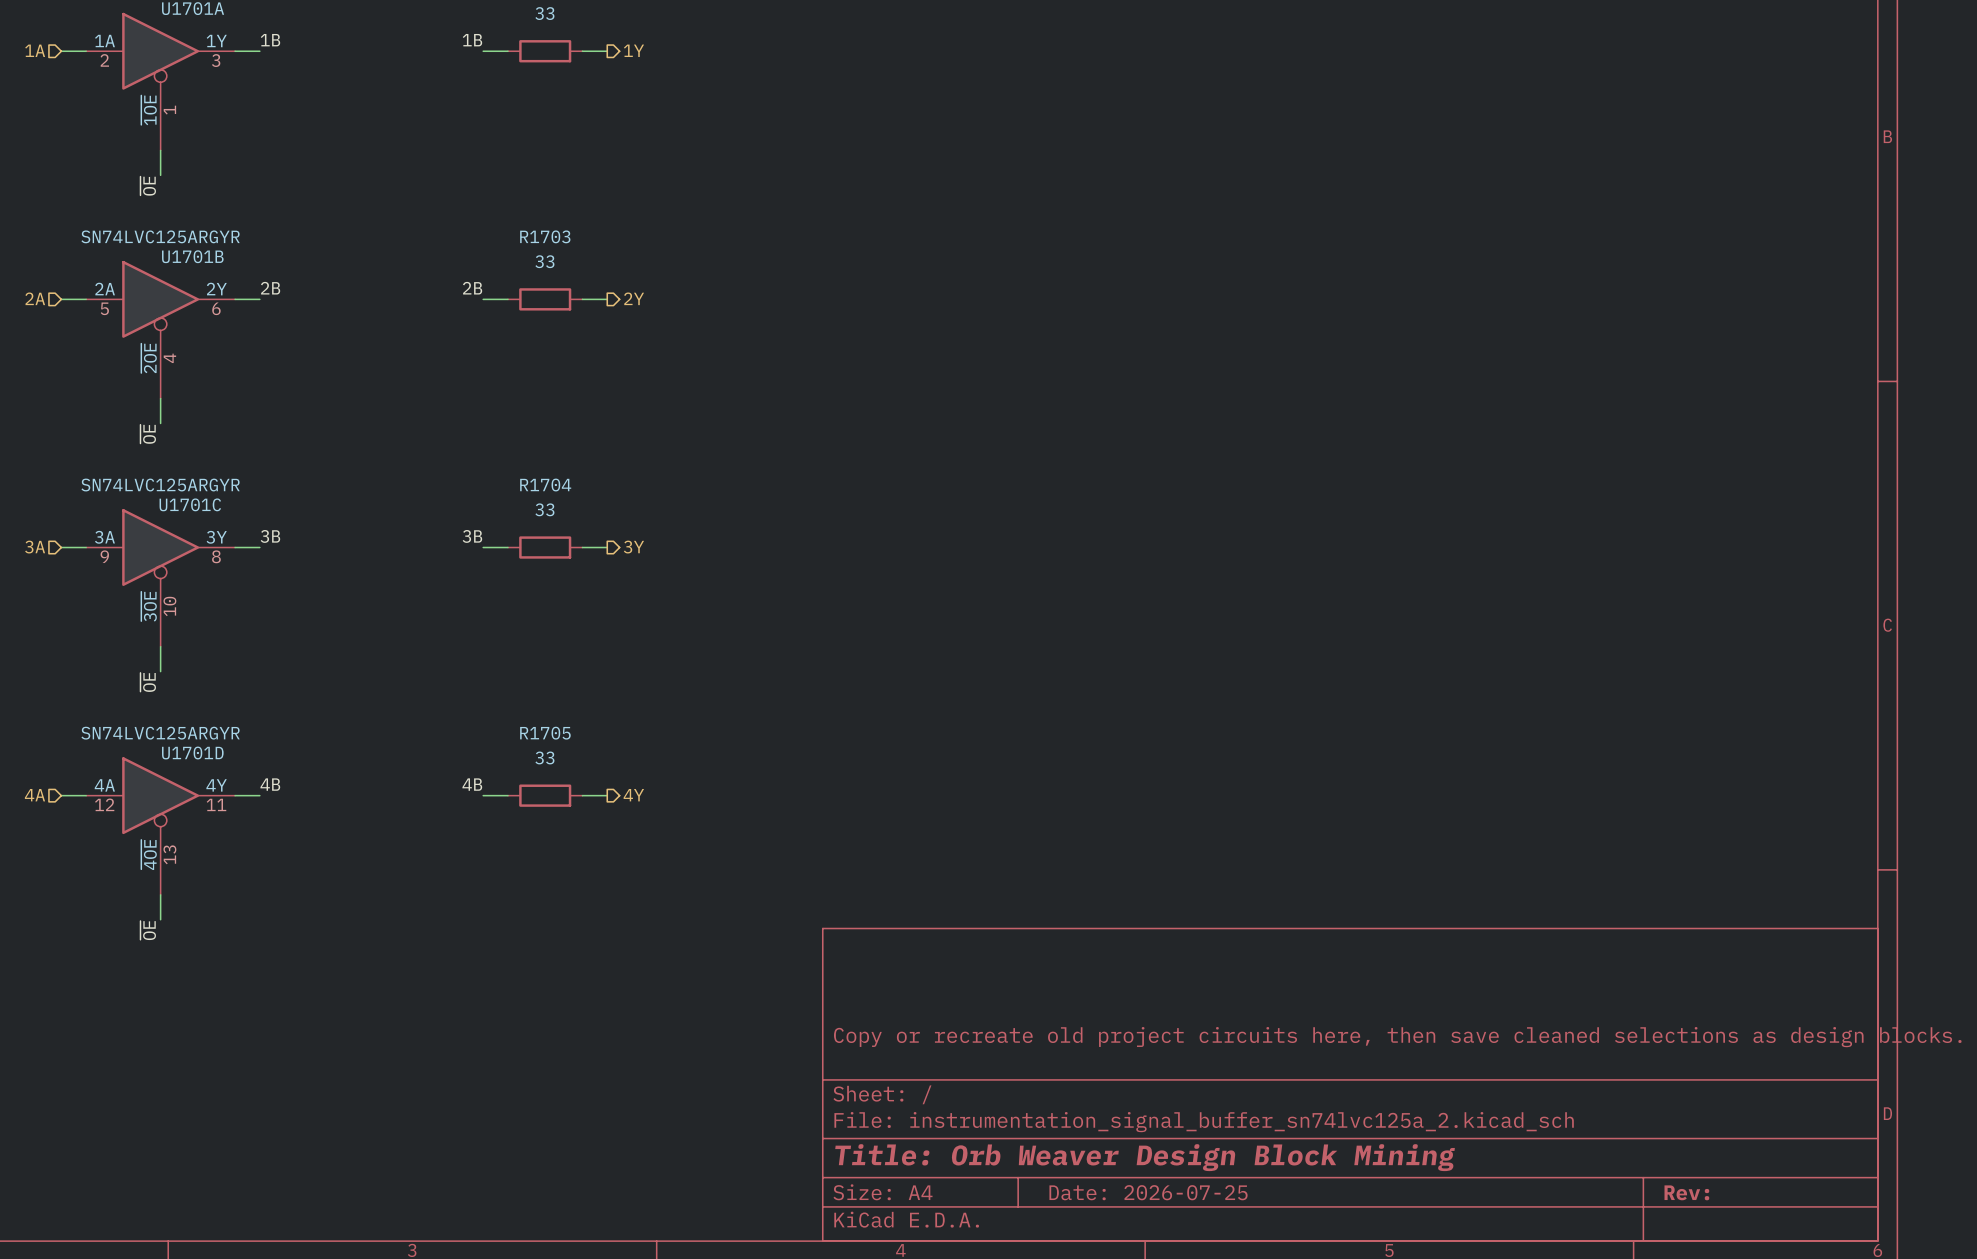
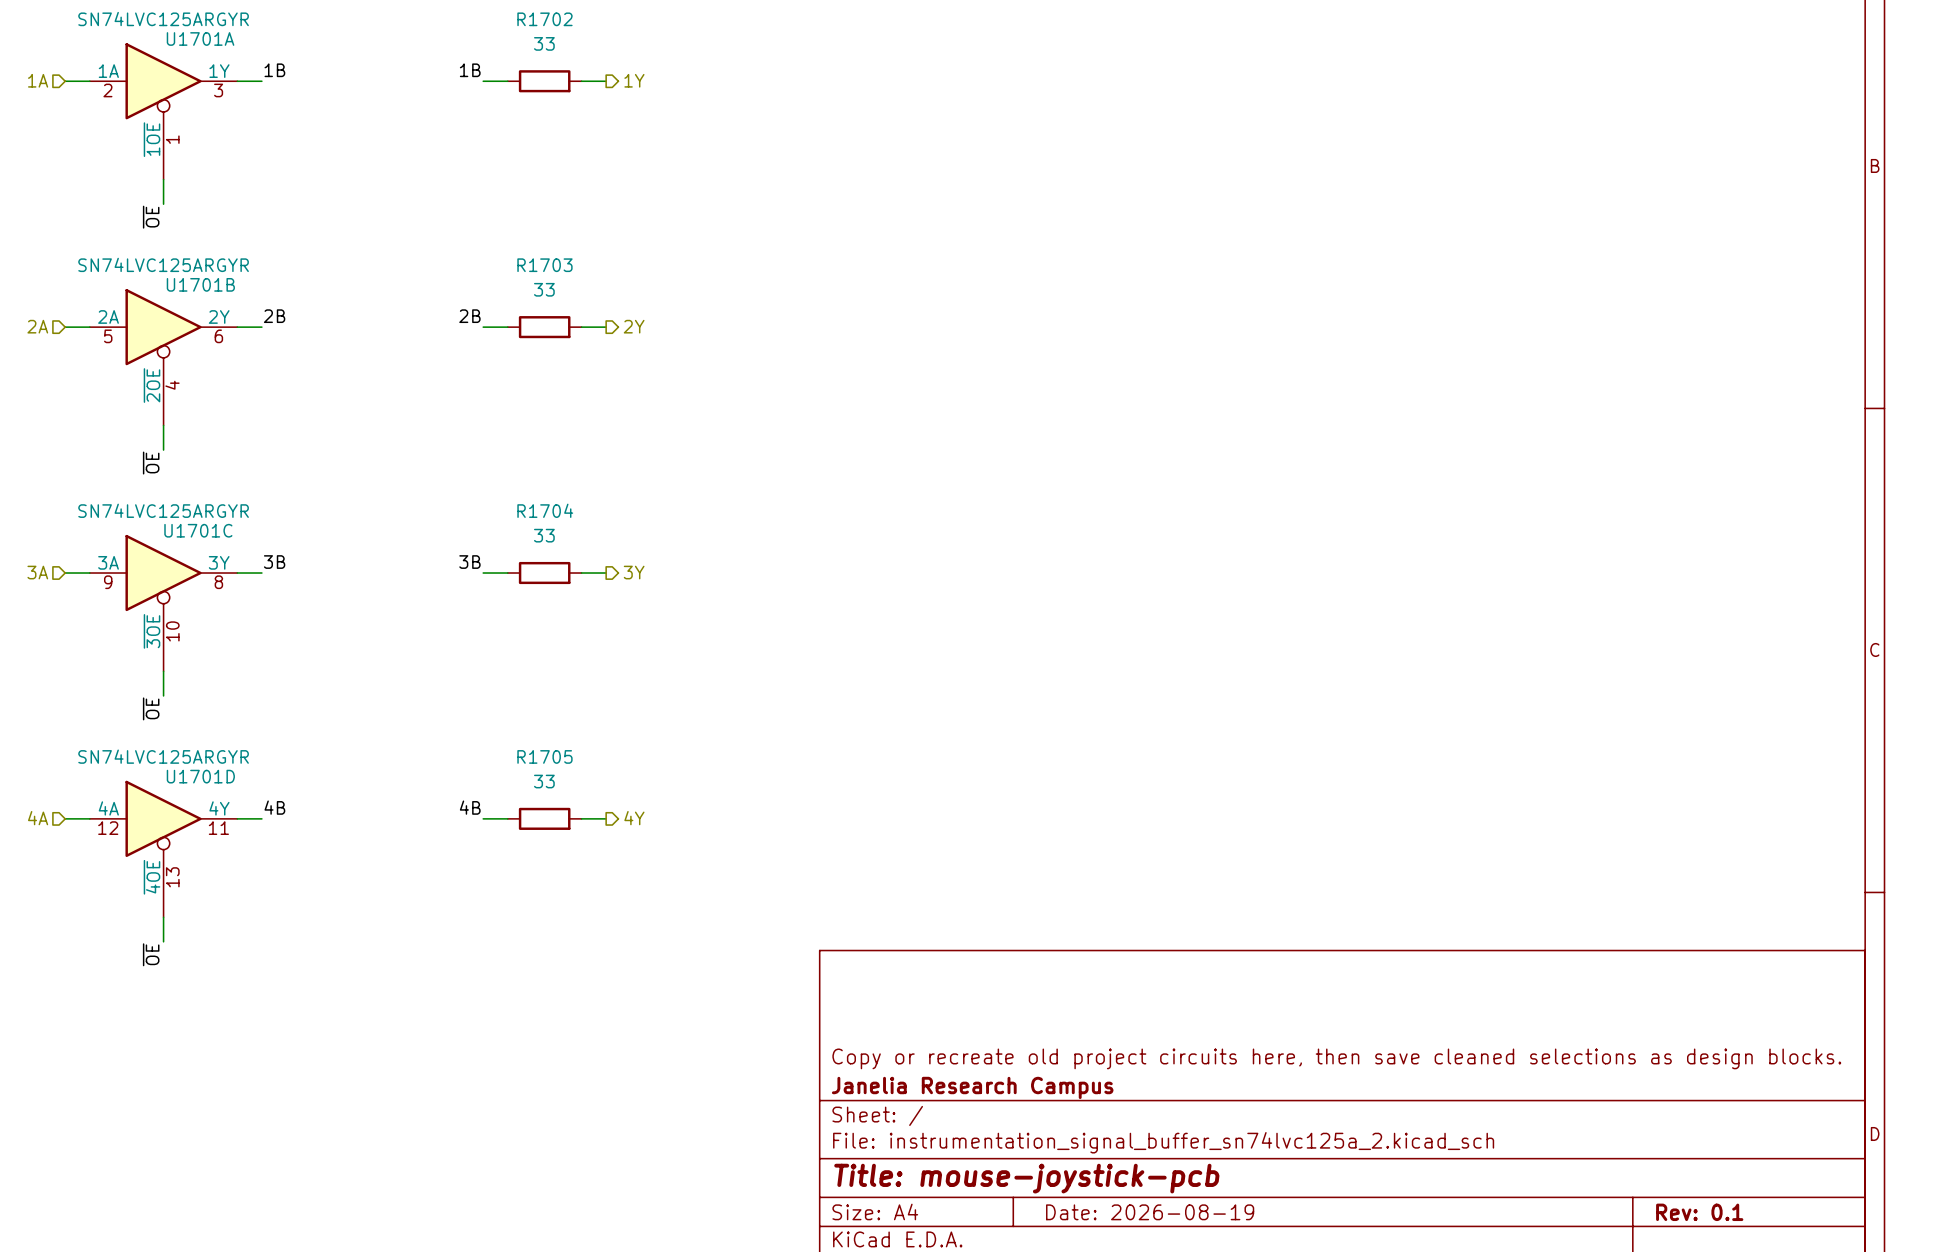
title block: none -> Janelia Research Campus (972, 1087)
title block: Title: Orb Weaver Design Block Mining (1145, 1157) -> Title: mouse-joystick-pcb (1026, 1178)
title block: Date: 2026-07-25 (1148, 1192) -> Date: 2026-08-19 (1150, 1212)
title block: Rev: (1686, 1192) -> Rev: 0.1 (1699, 1212)

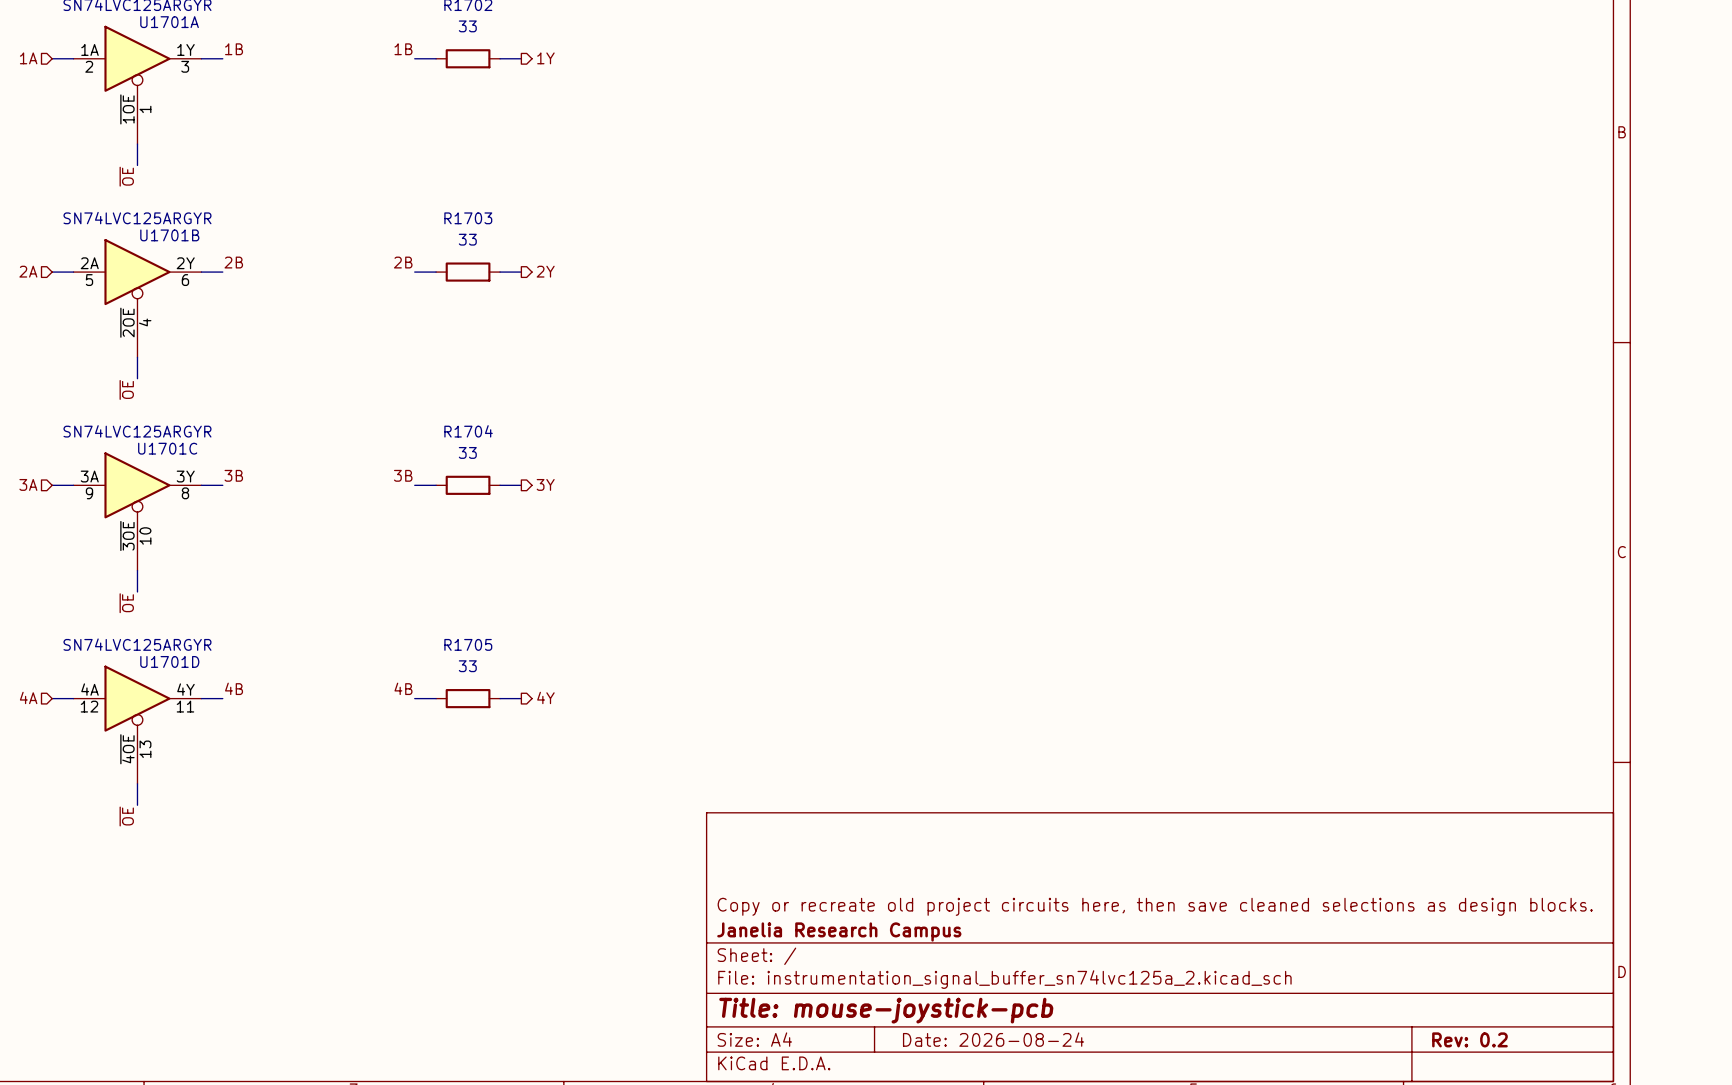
title block: Date: 2026-08-19 (1150, 1212) -> Date: 2026-08-24 (993, 1039)
title block: Rev: 0.1 (1699, 1212) -> Rev: 0.2 (1469, 1039)

